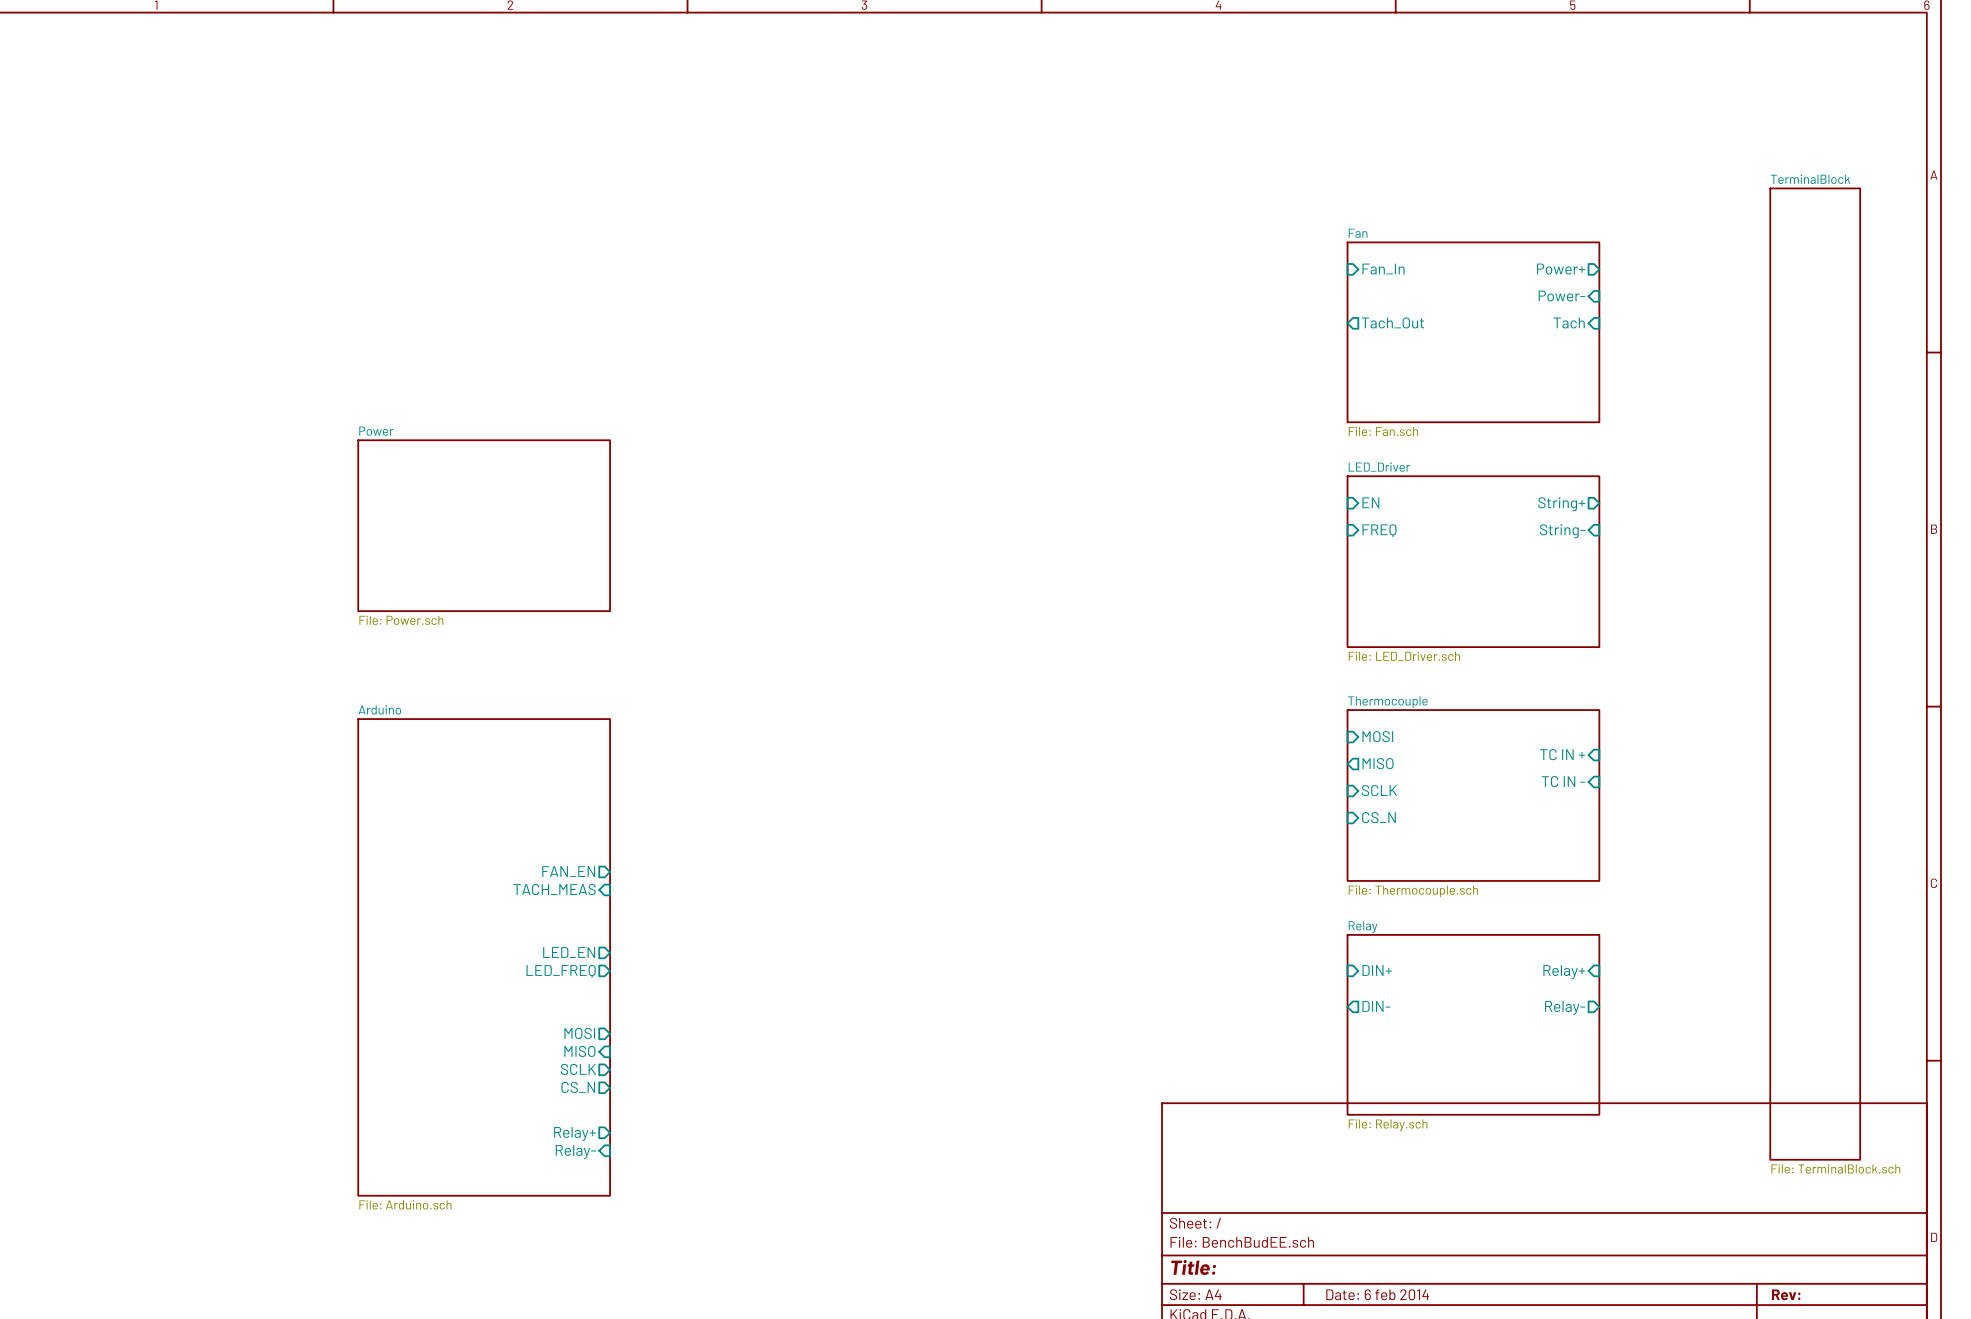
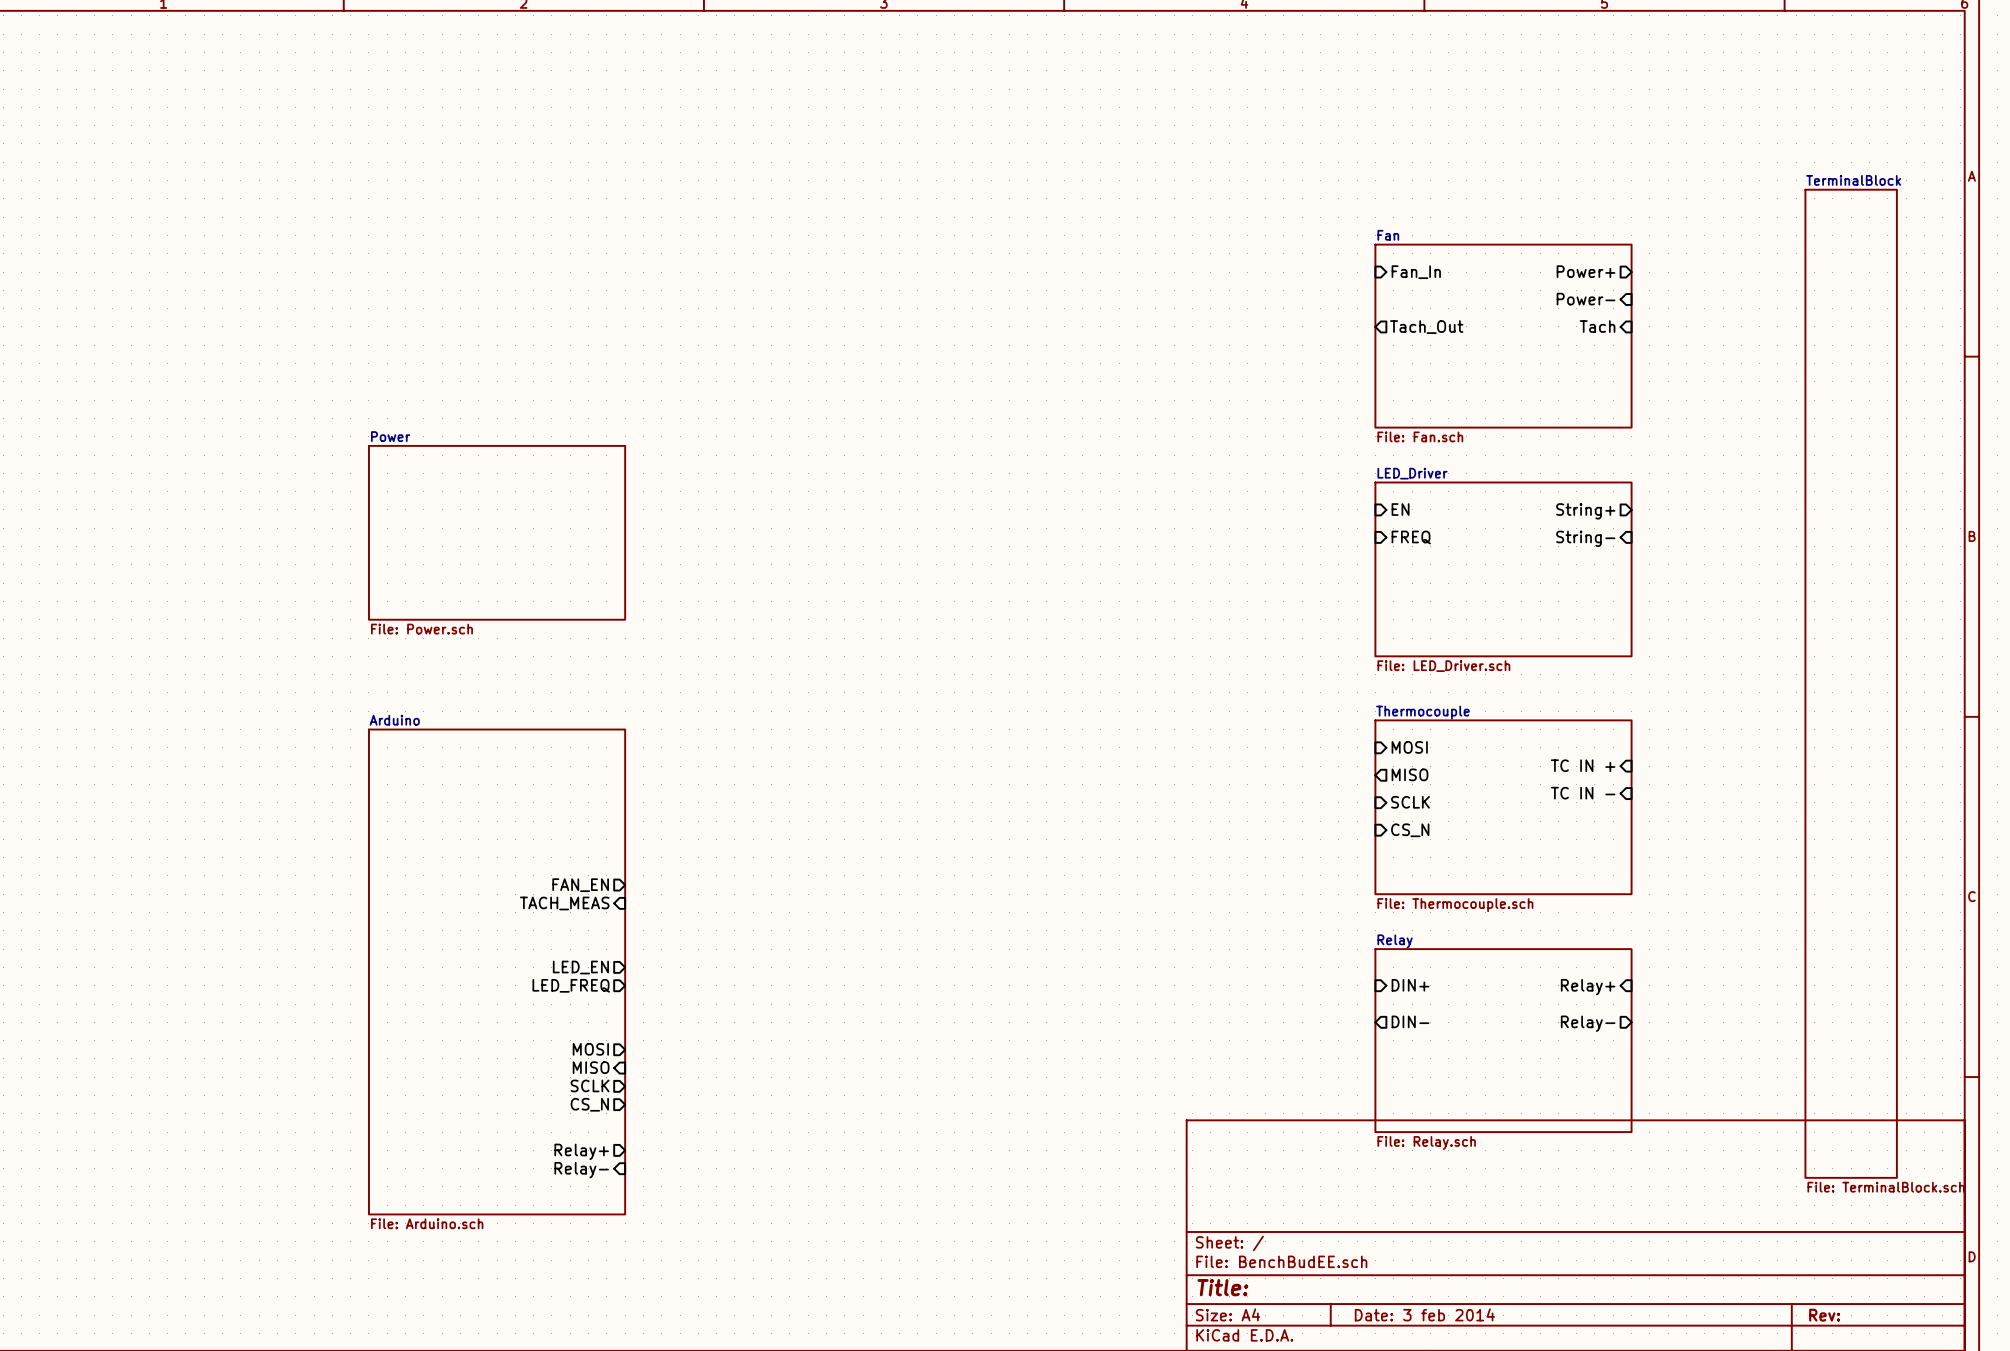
title block: Date: 6 feb 2014 (1377, 1294) -> Date: 3 feb 2014 (1424, 1314)

